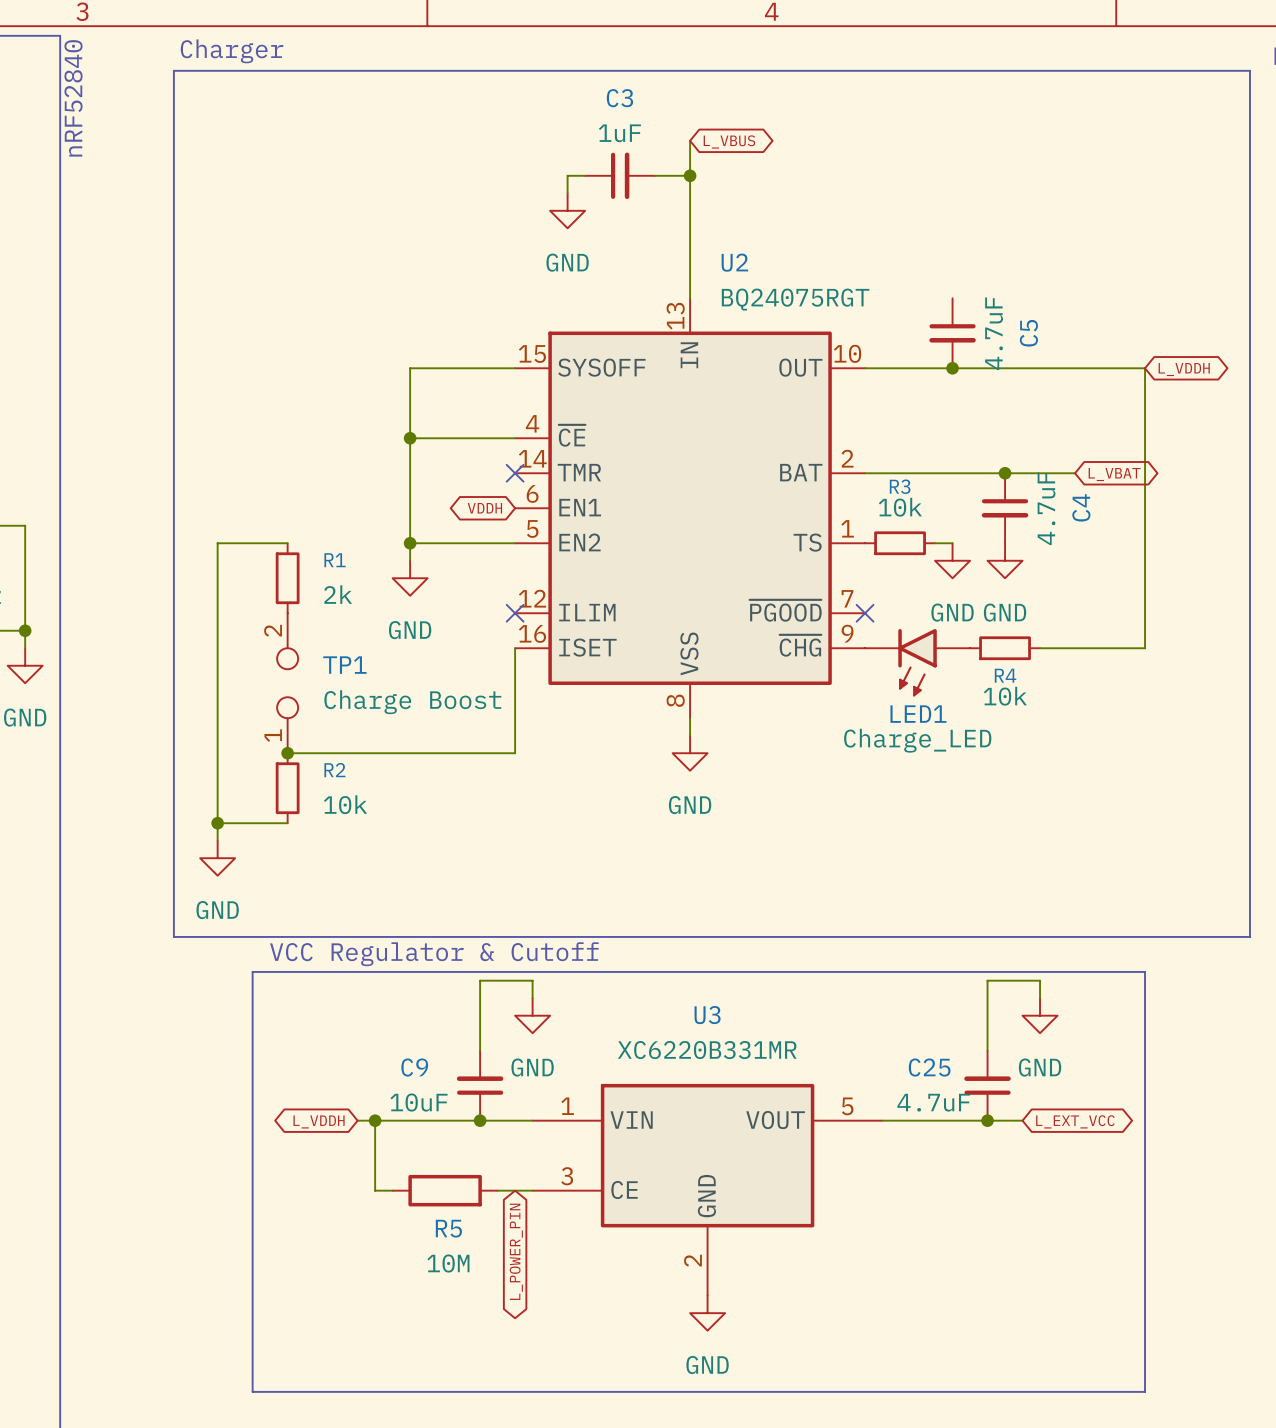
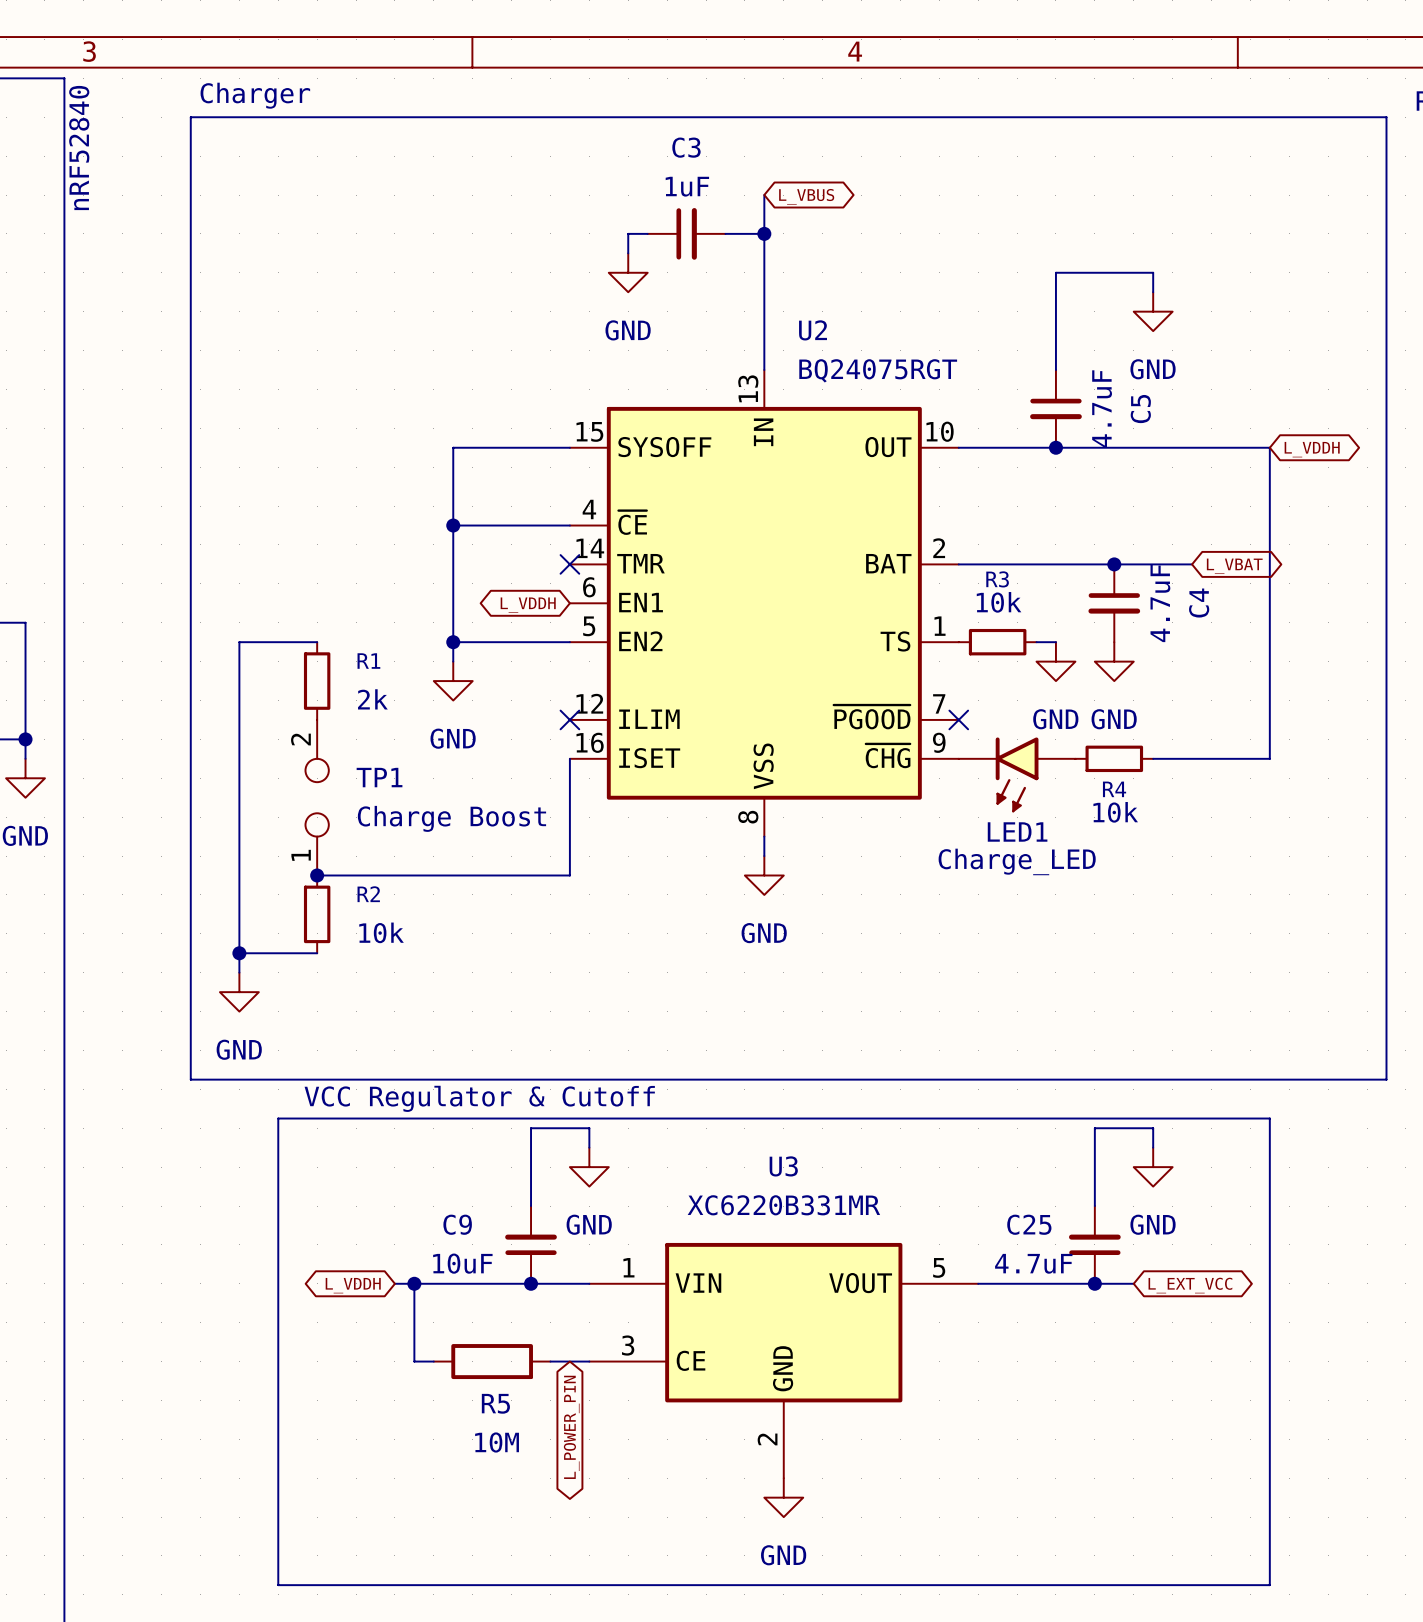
wire: none -> (1153, 292) (1153, 272) (1055, 272) (1055, 369)
power symbol: none -> GND (1153, 311)
global label: VDDH (484, 508) -> L_VDDH (528, 605)

